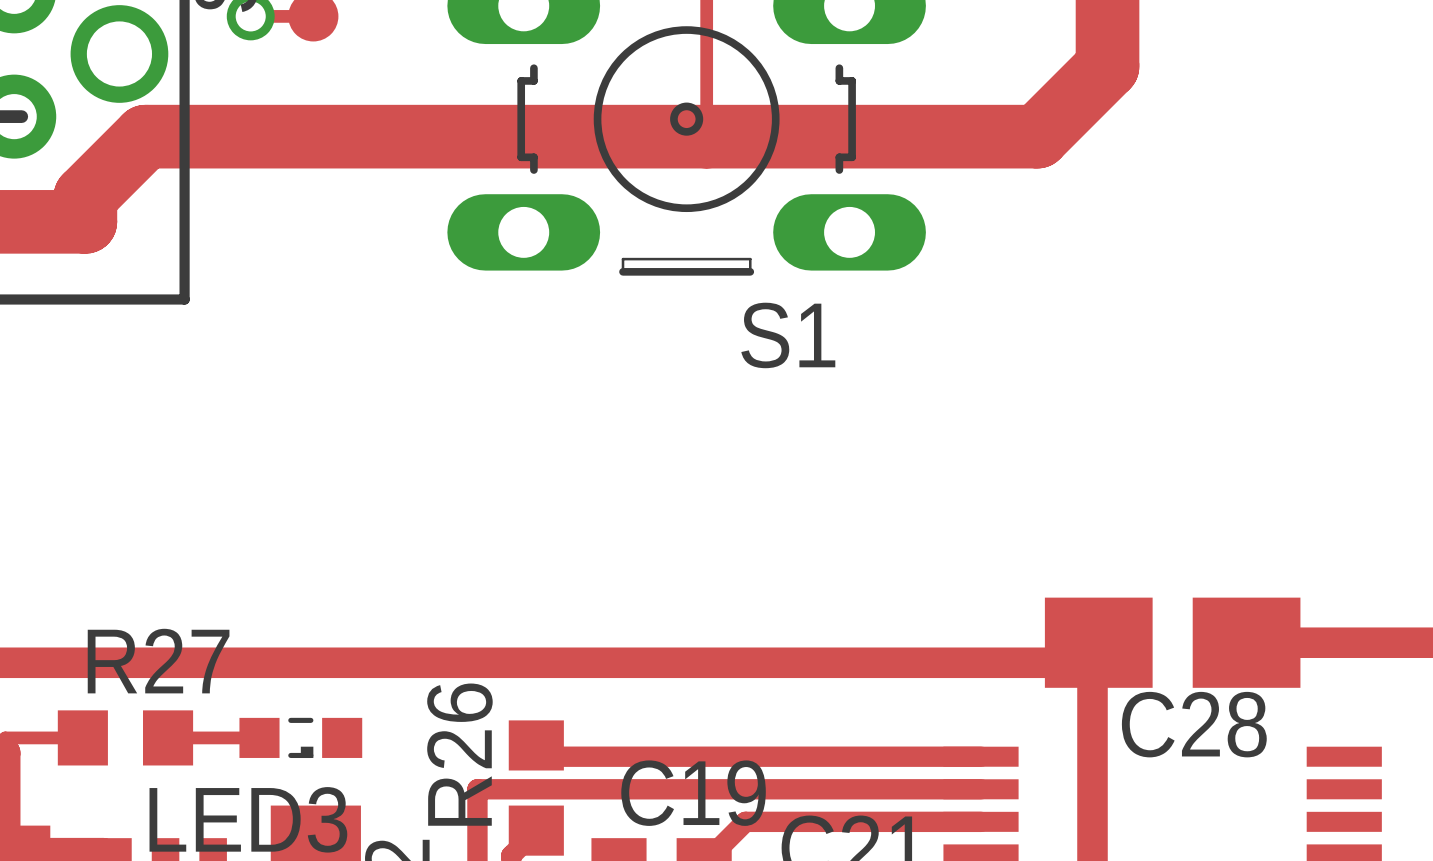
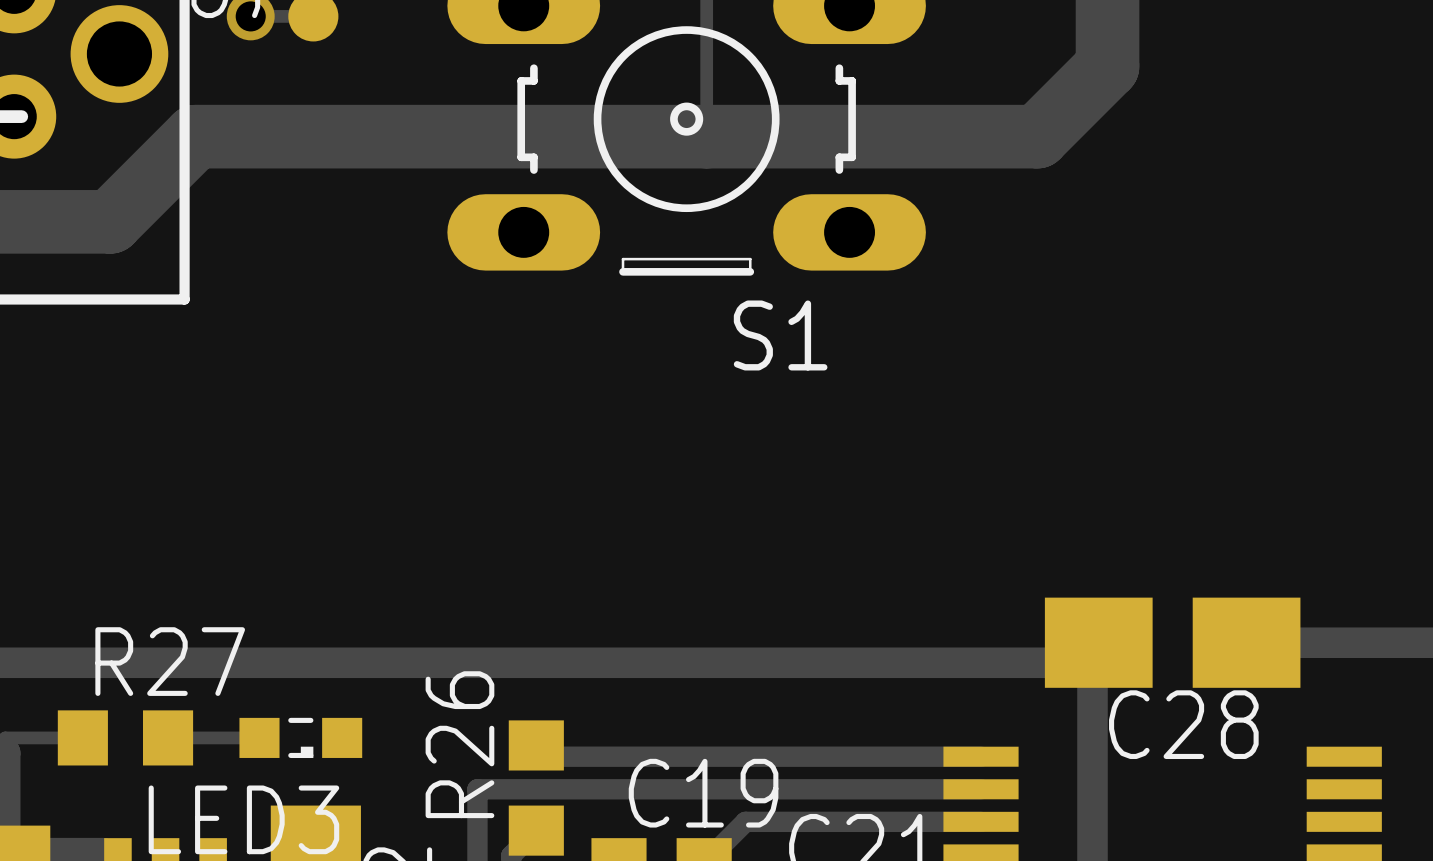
track: (195, 136) (145, 136) (85, 196) (85, 221) -> (195, 136) (110, 221) (85, 221)

